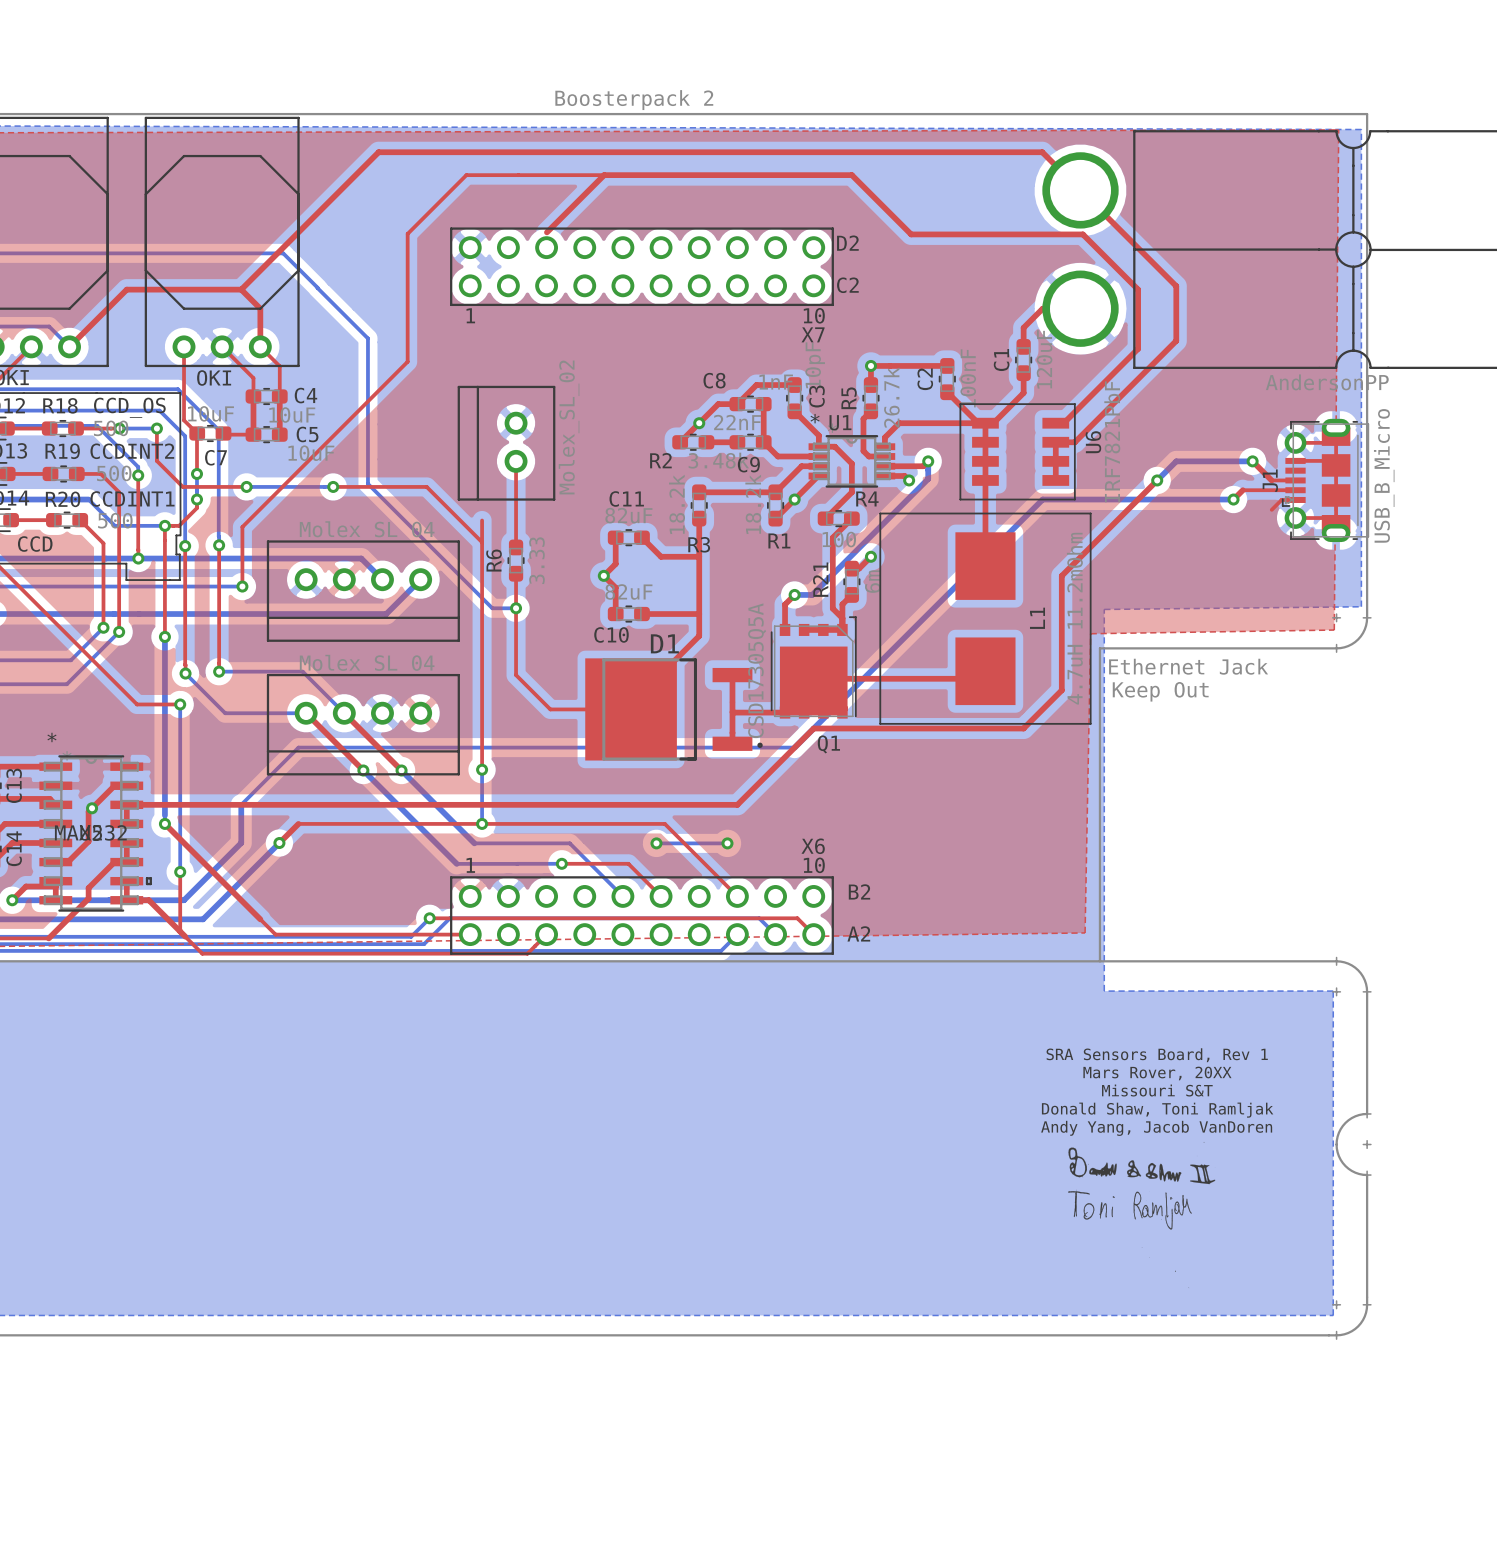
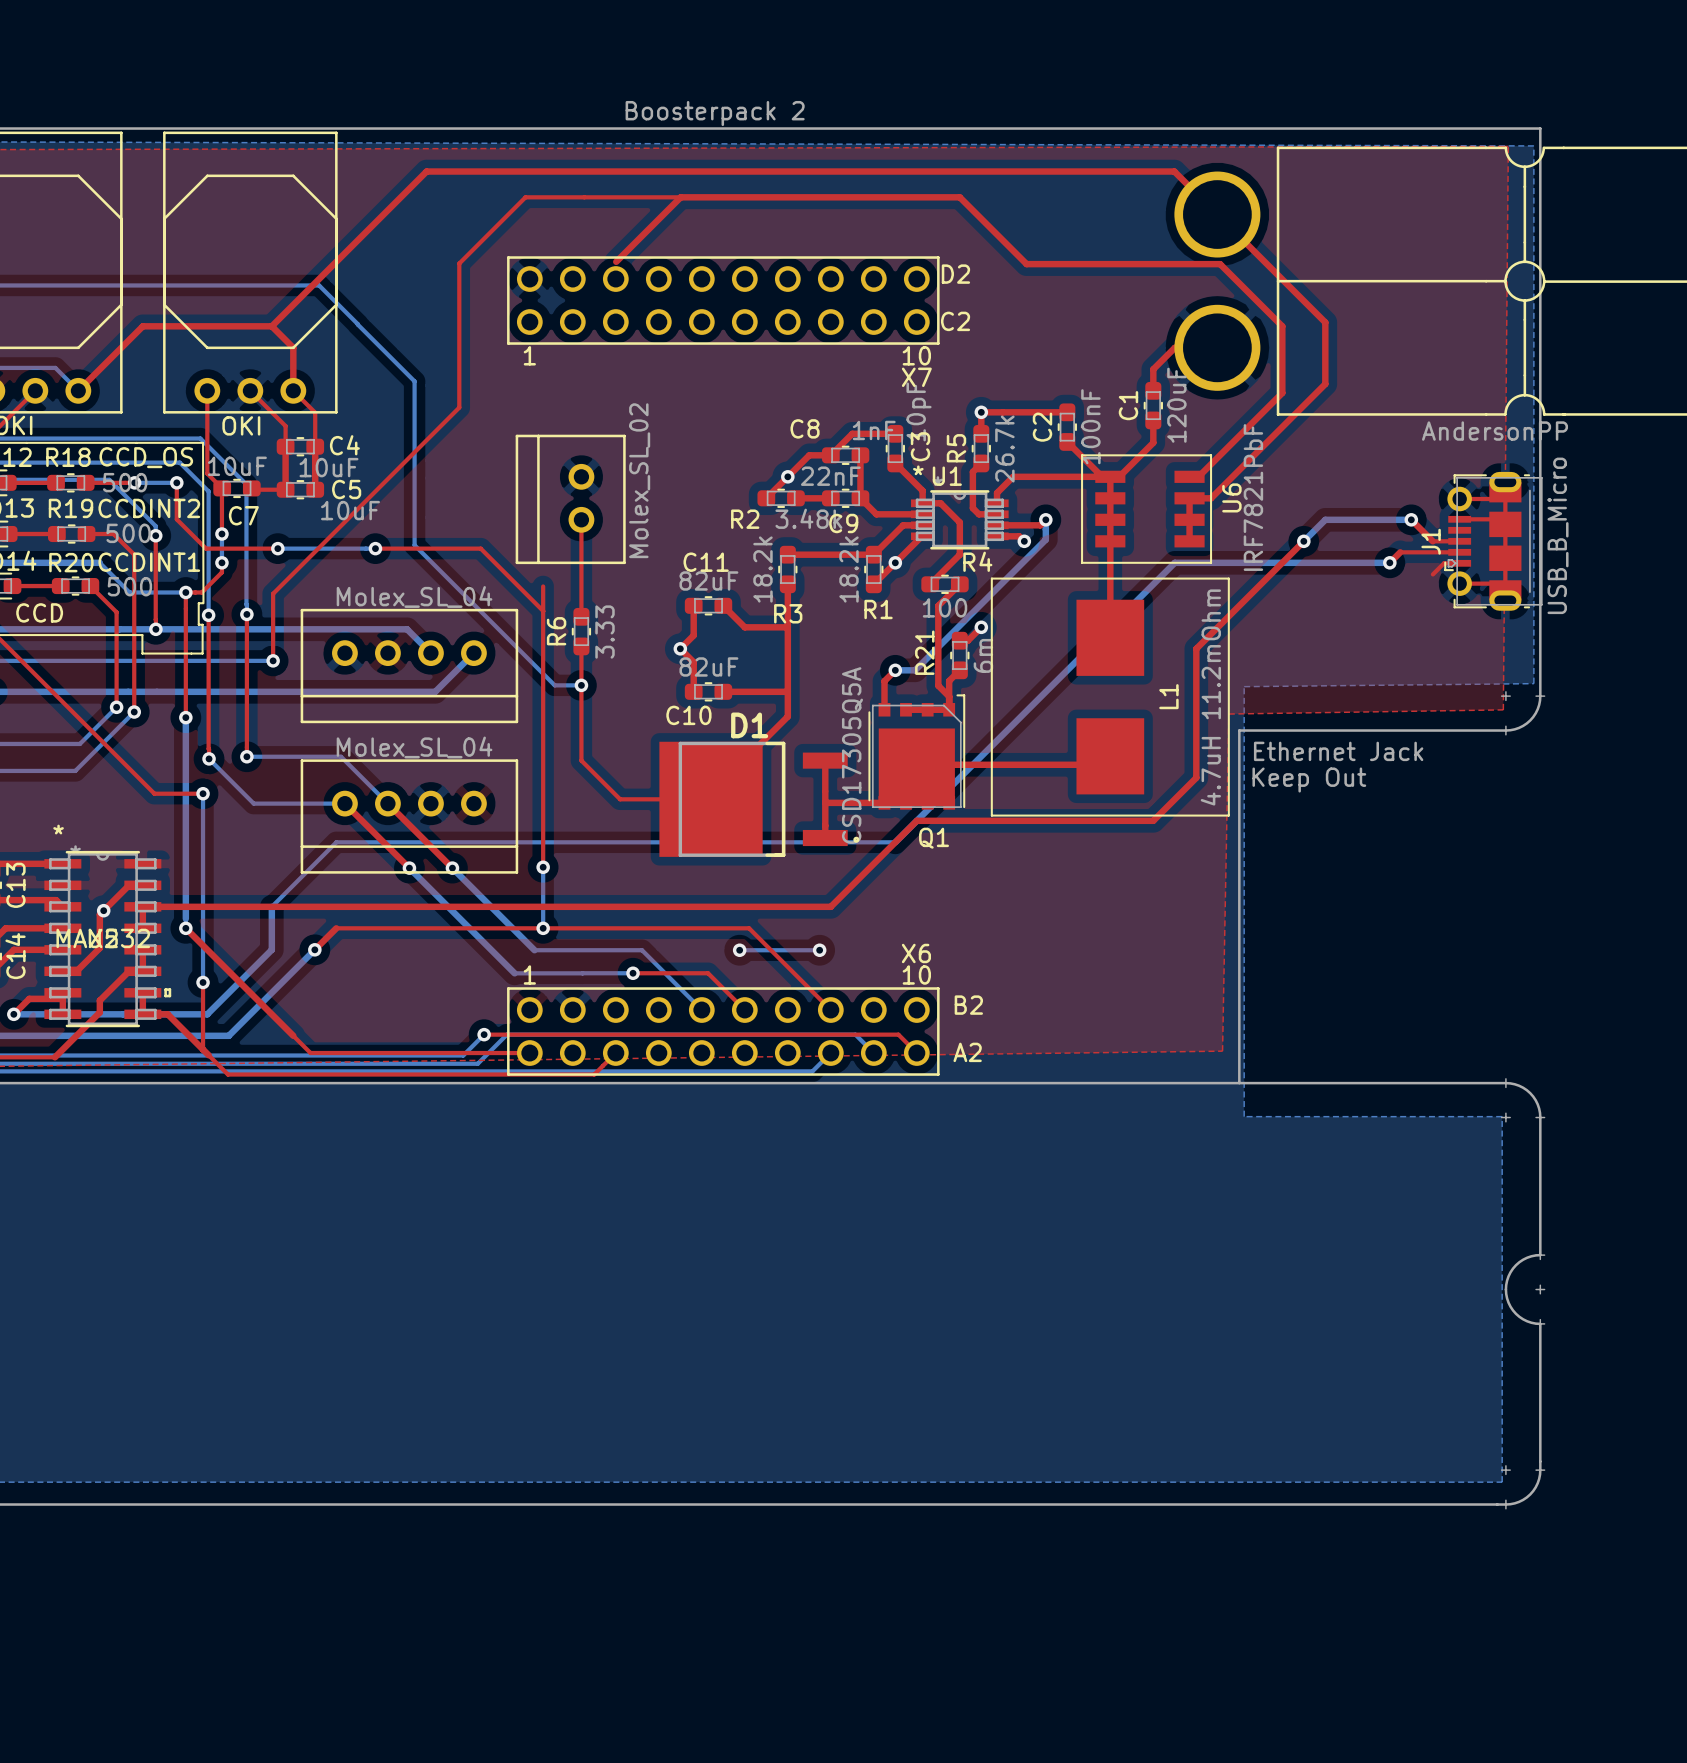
text: SRA Sensors Board, Rev 1 (1157, 1055) -> none
text: Mars Rover, 20XX (1157, 1073) -> none
text: Missouri S&T (1157, 1090) -> none
text: Donald Shaw, Toni Ramljak (1157, 1110) -> none
text: Andy Yang, Jacob VanDoren (1156, 1128) -> none
drawing: [1068, 1141, 1216, 1289] -> none

